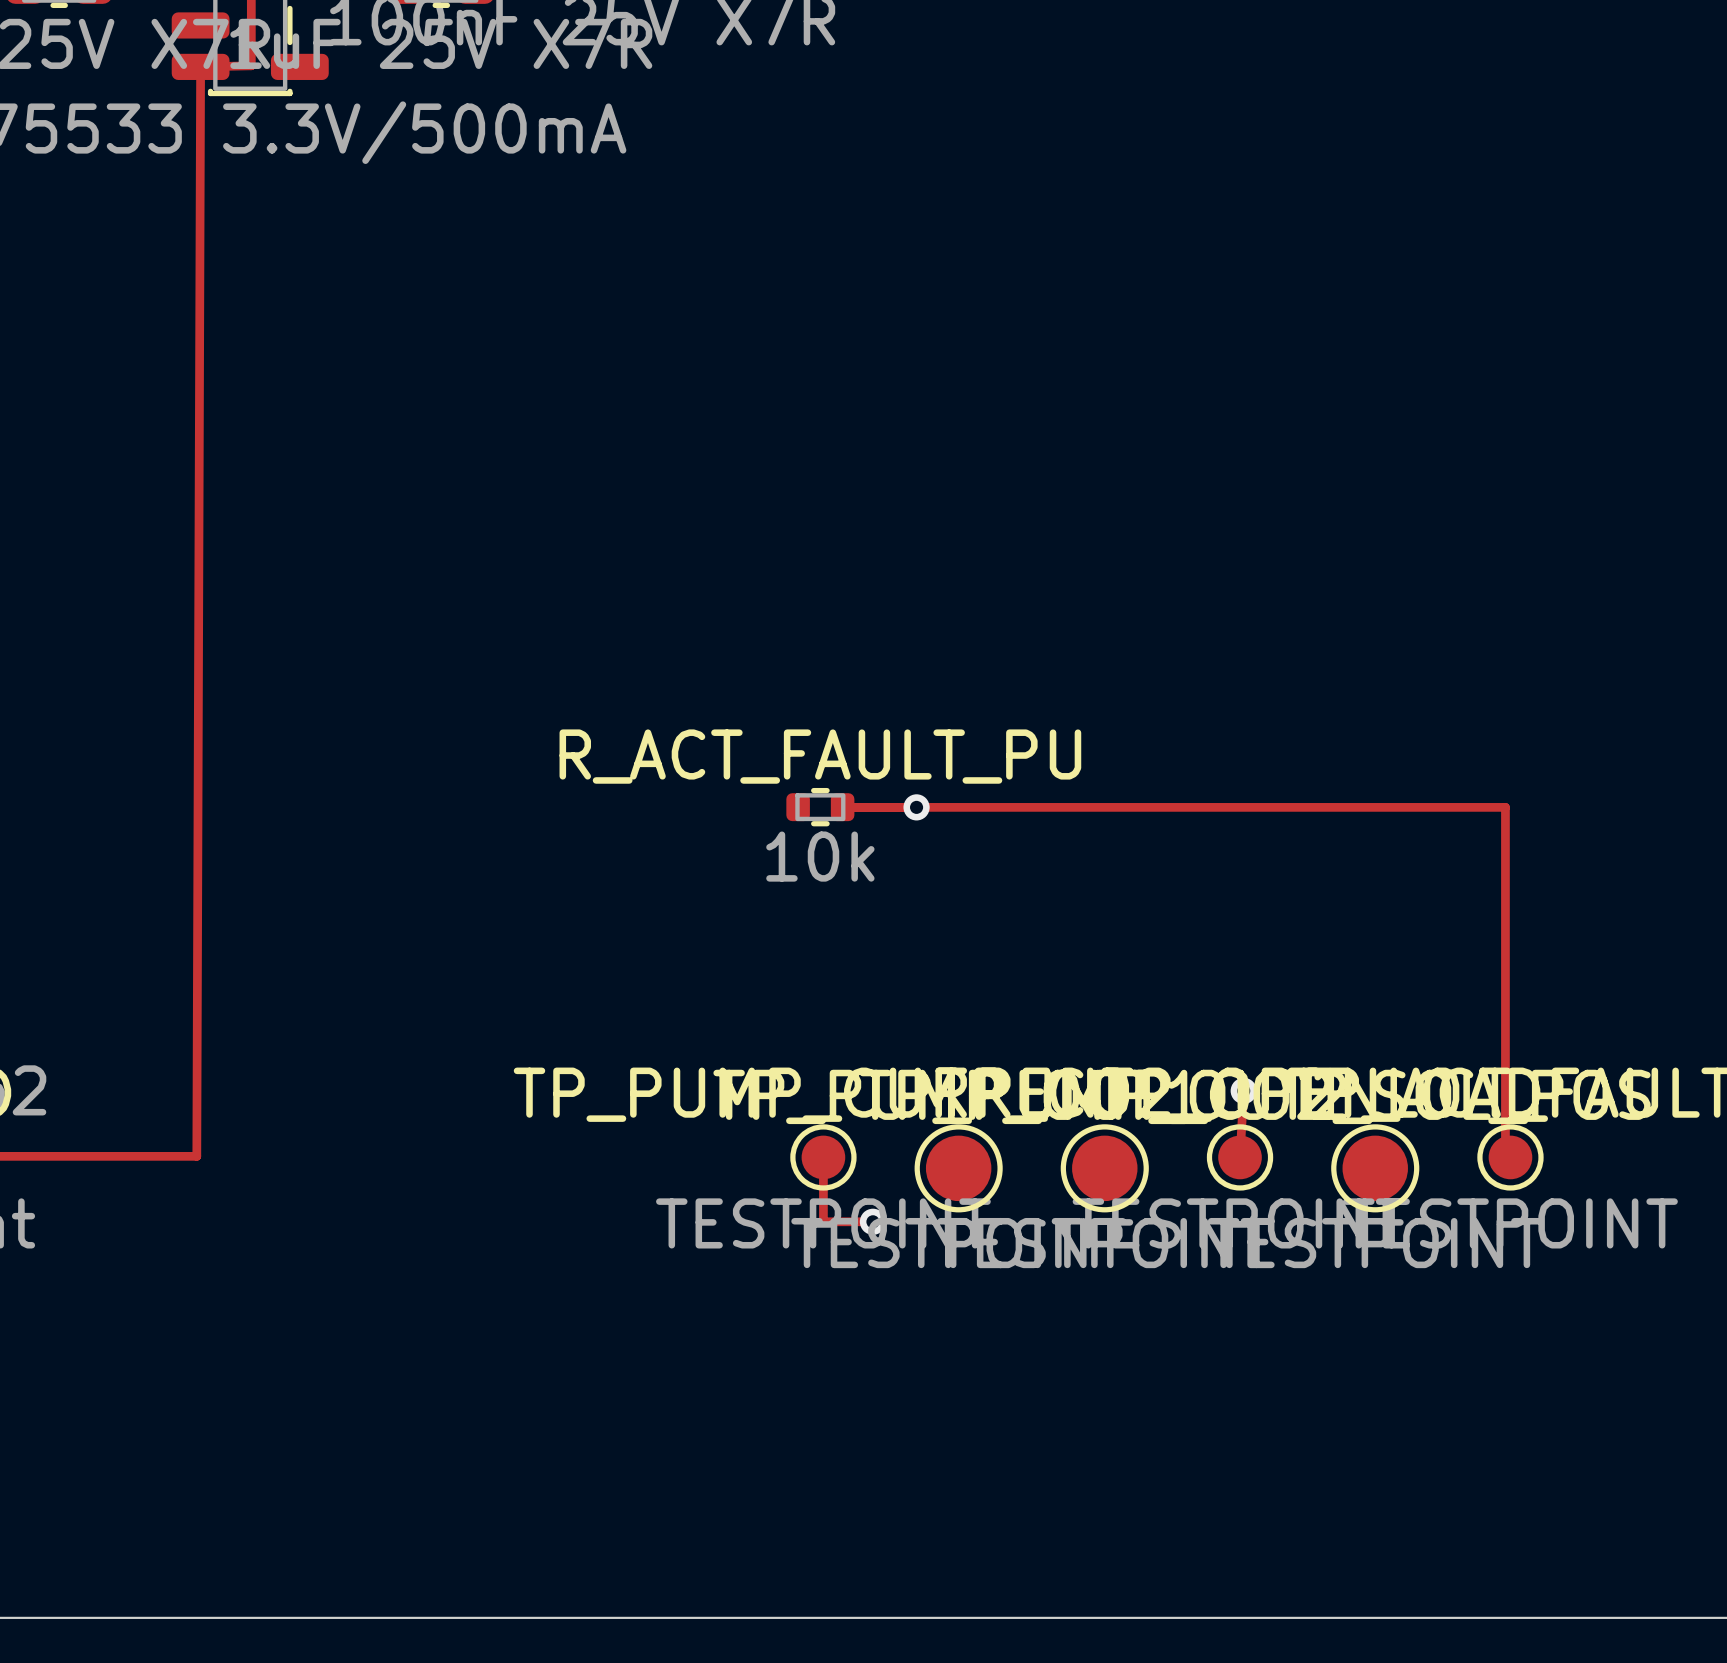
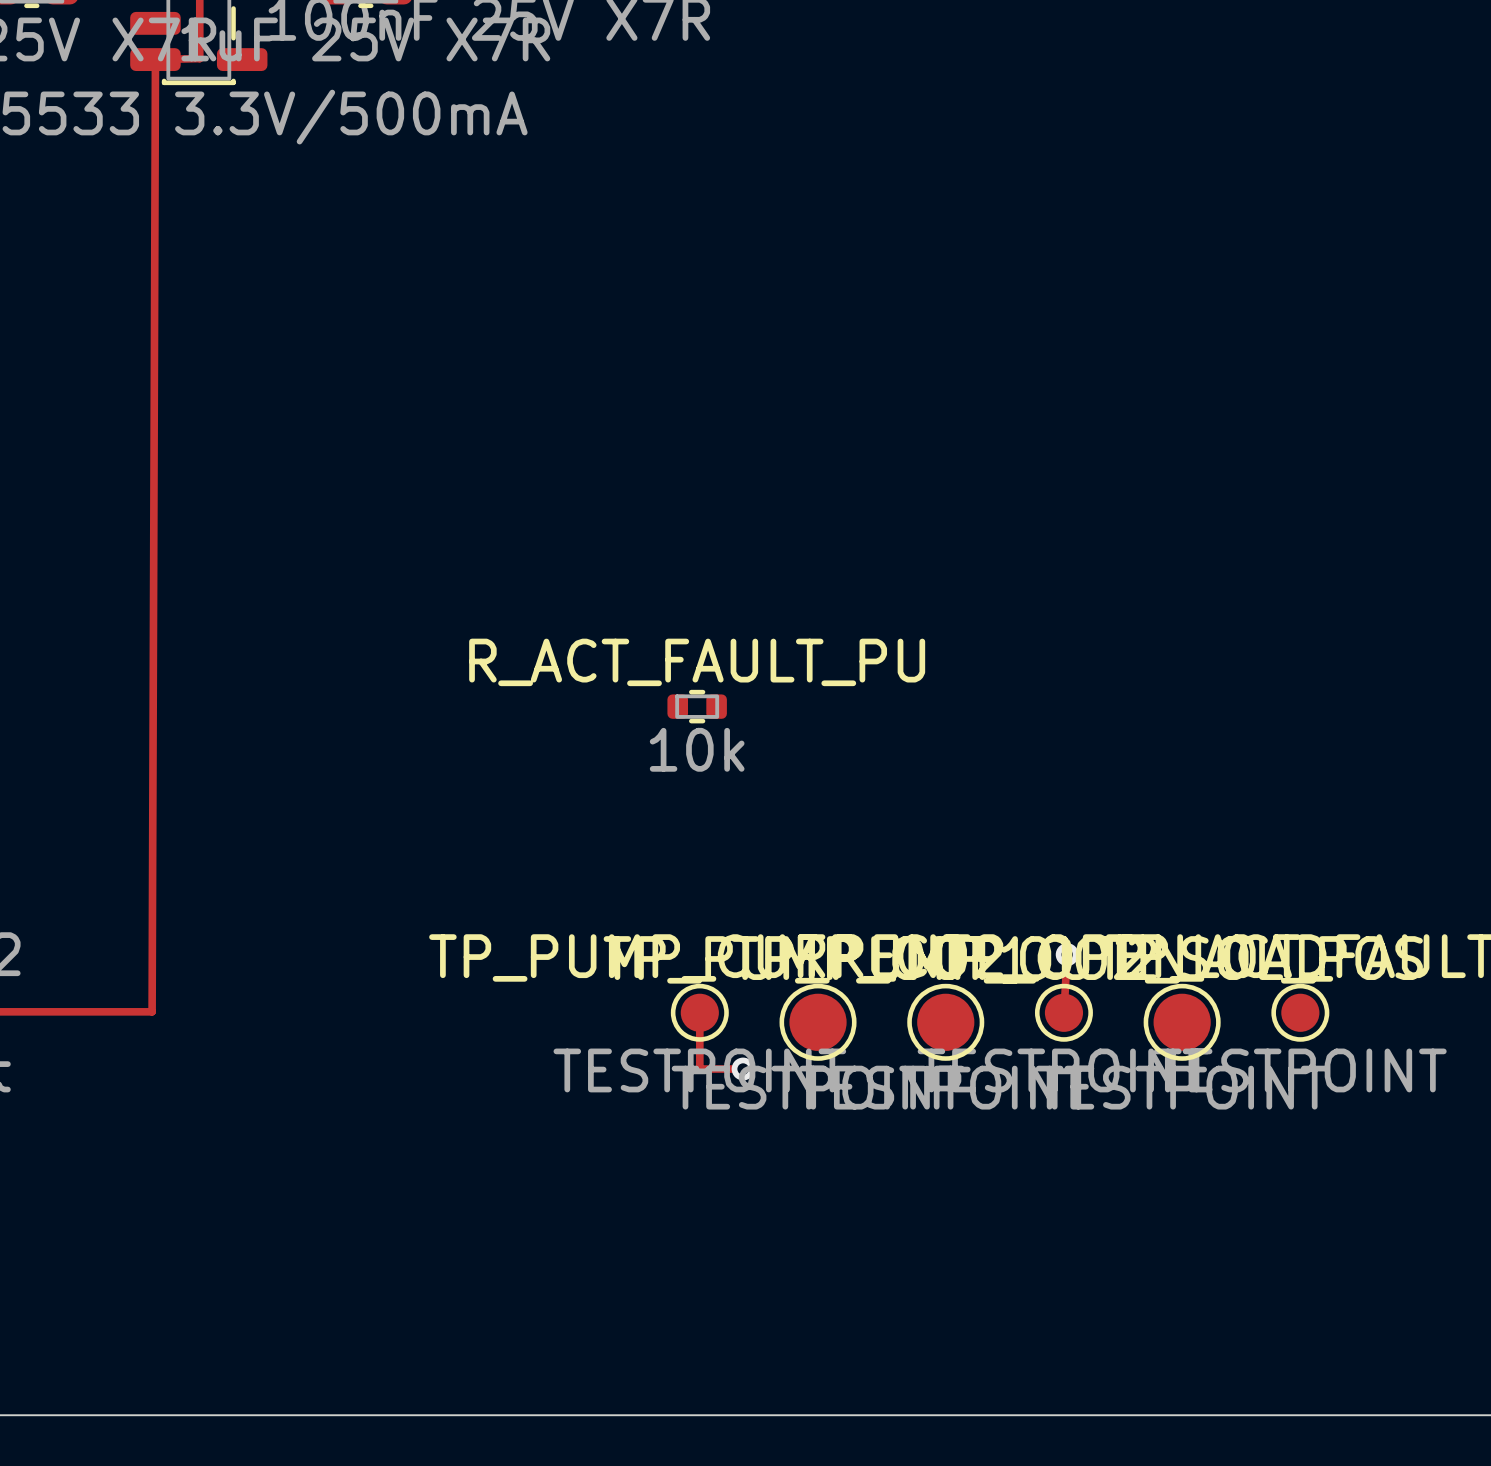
track: (842, 807) (840, 807) (1505, 807) (1505, 1156) (1510, 1157) -> none
via: (916, 807) -> none

